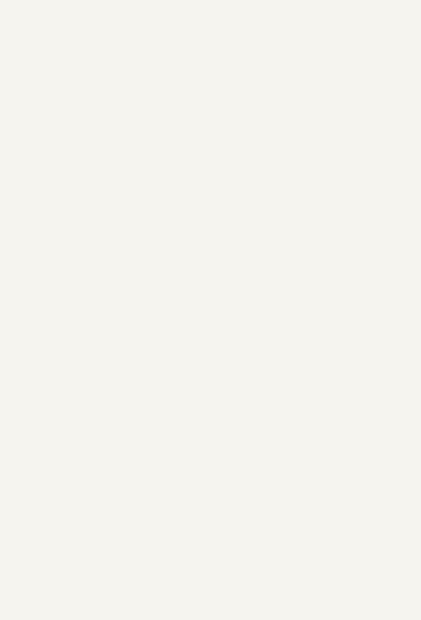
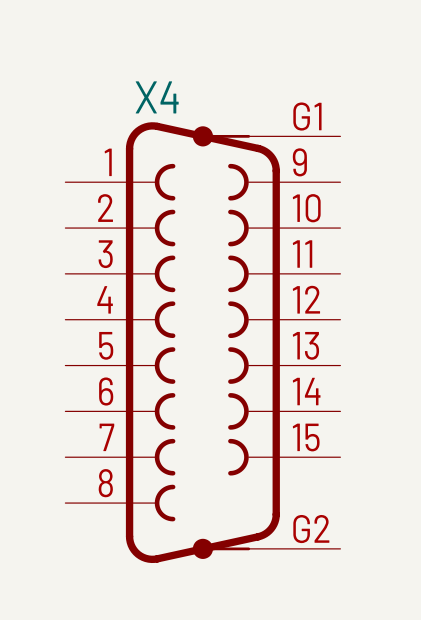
X4: none -> (202, 342)

